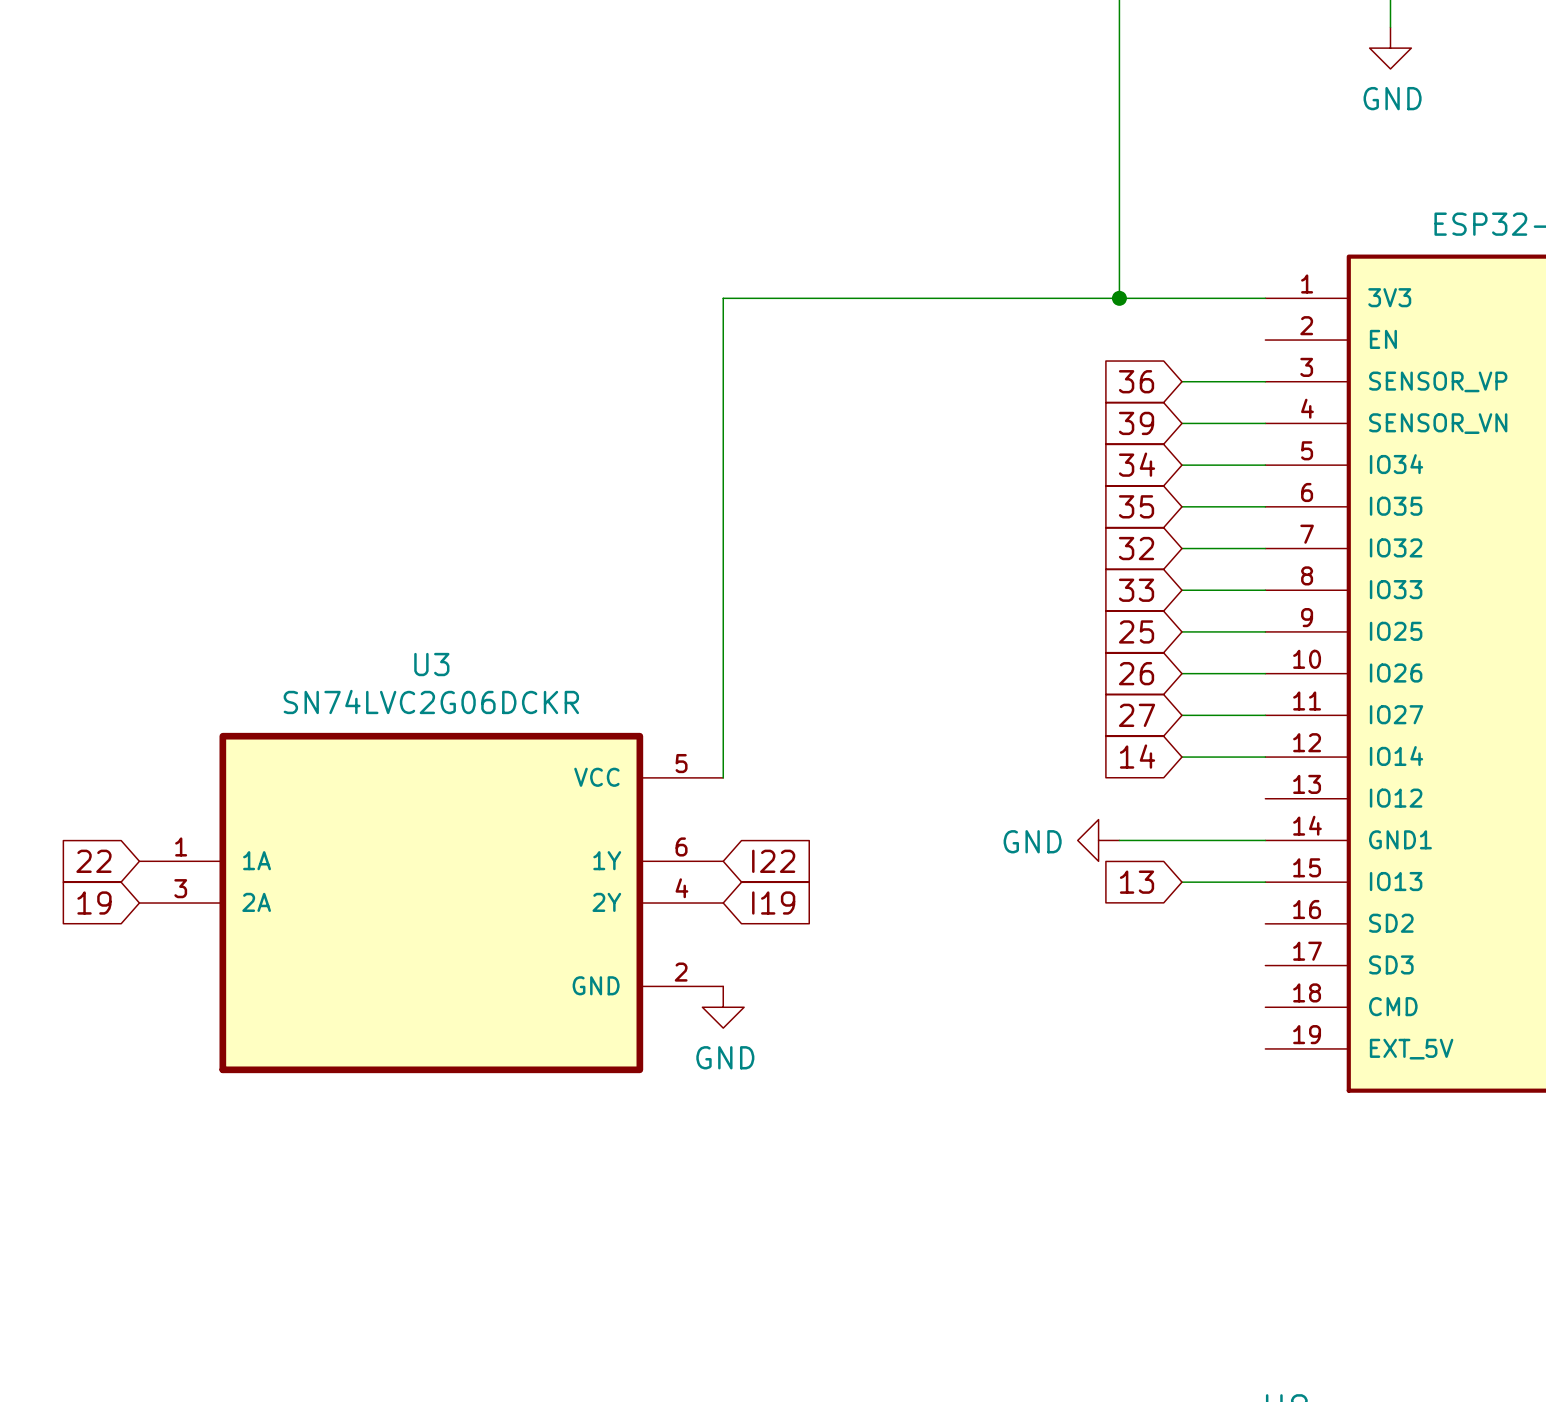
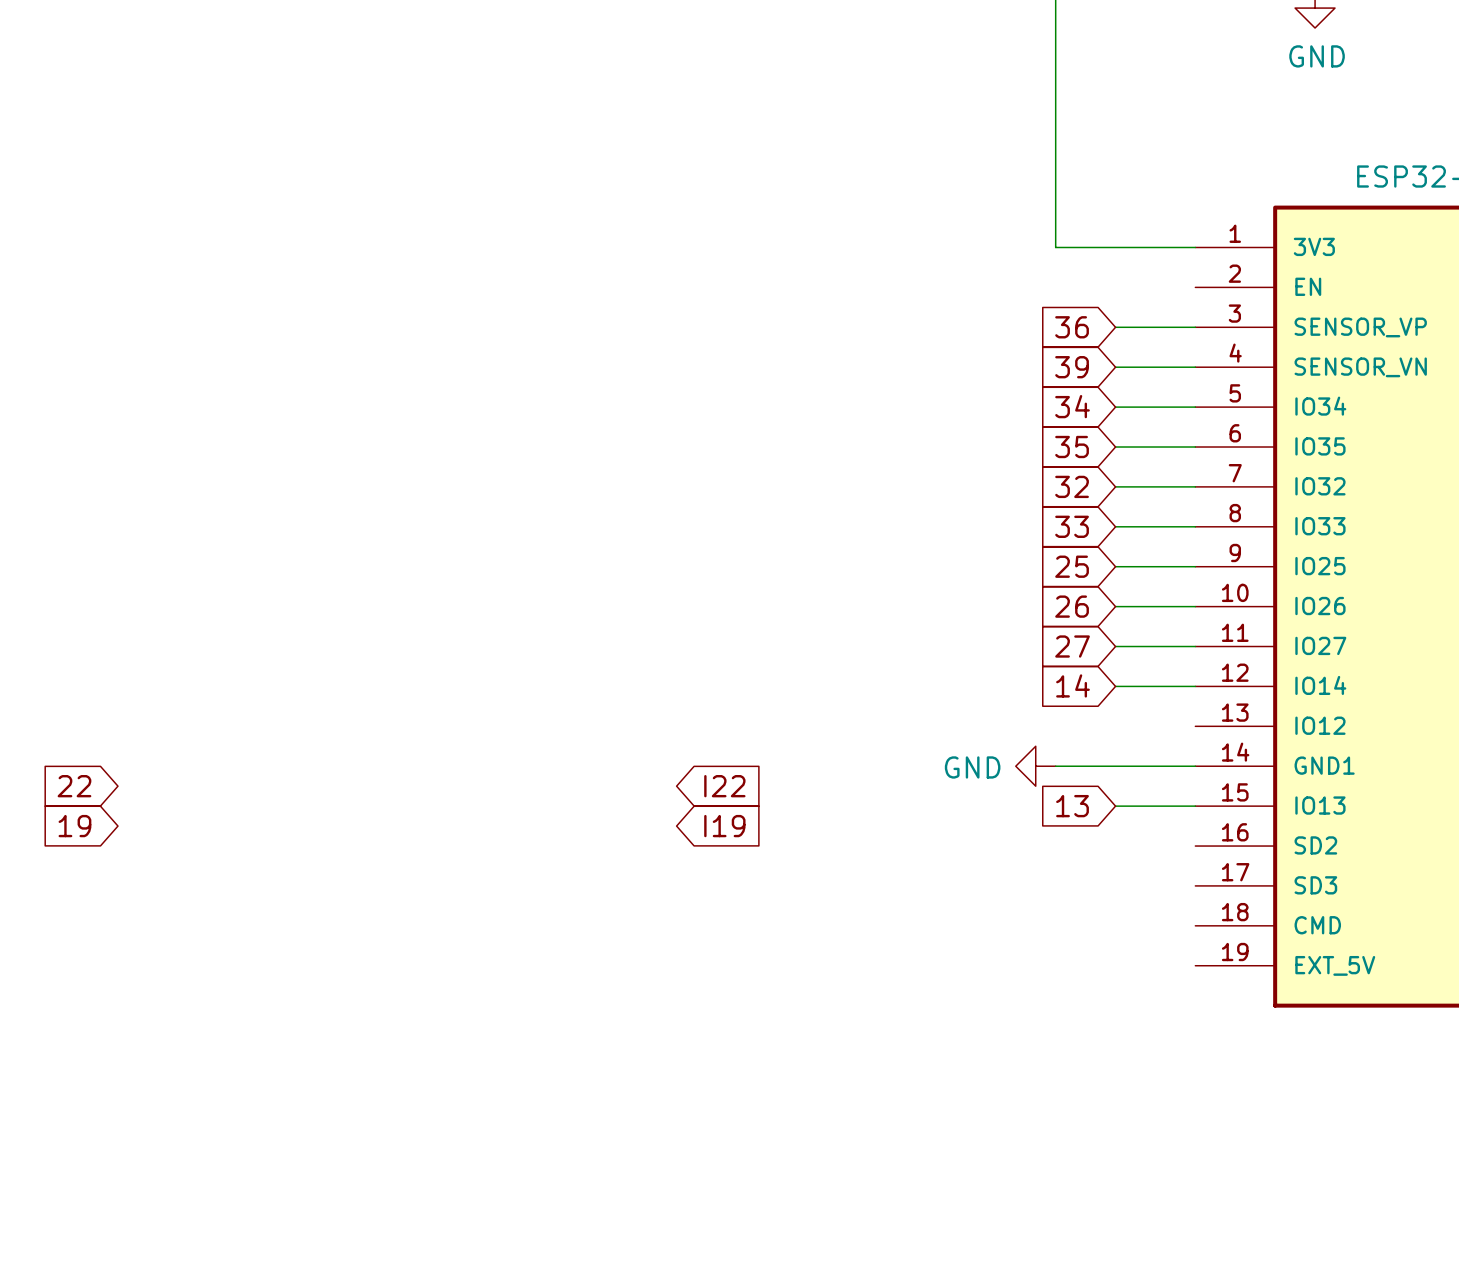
wire: (1119, 298) (723, 298) (723, 777) -> none
junction: (1119, 298) -> none
U3: SN74LVC2G06DCKR (431, 903) -> none
power symbol: GND (723, 1007) -> none

